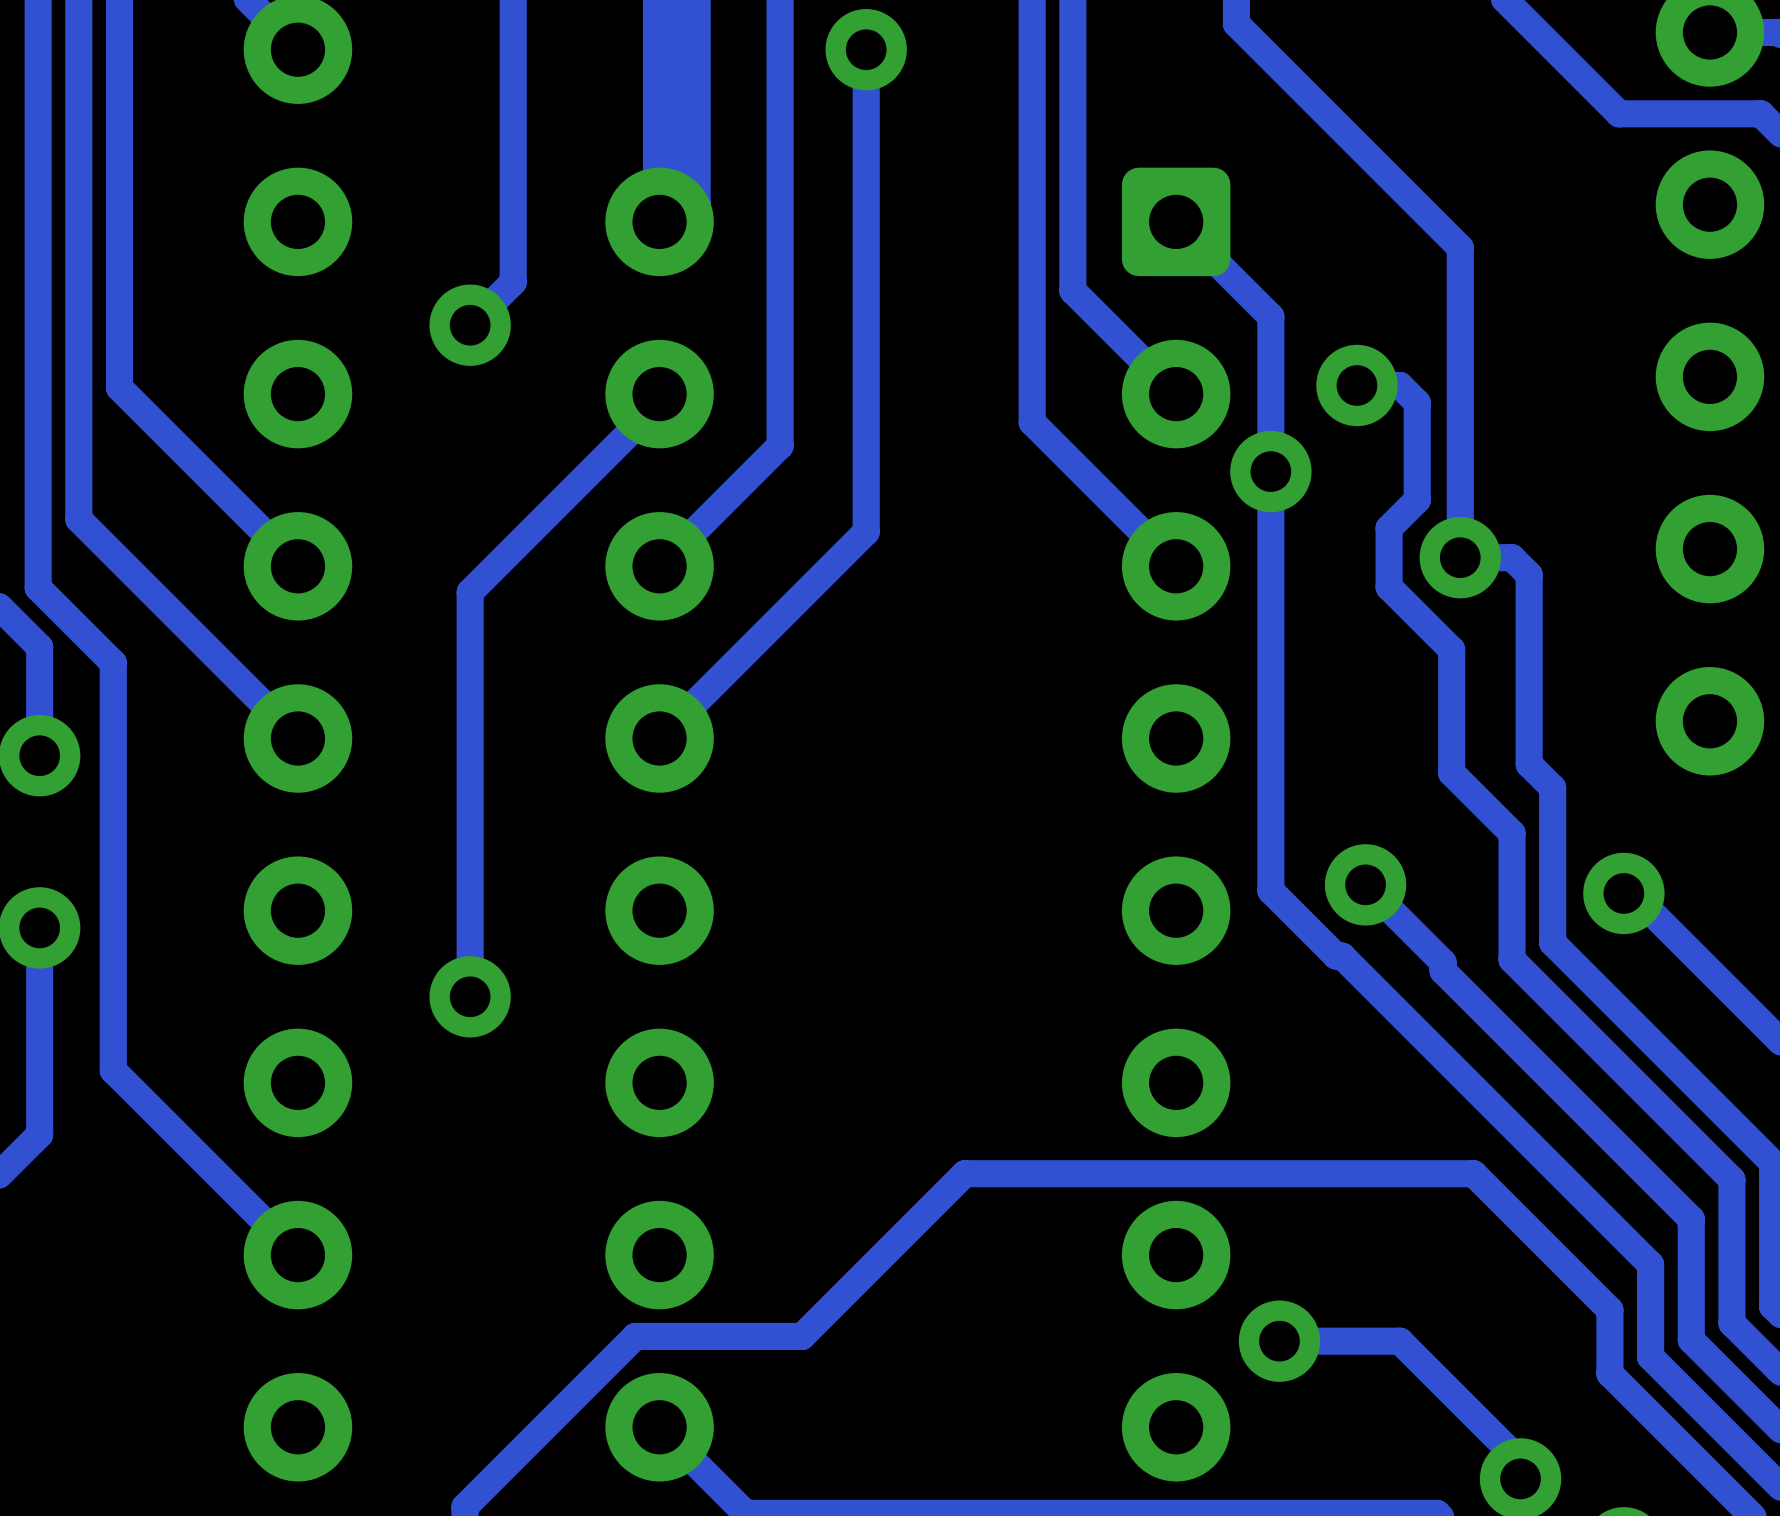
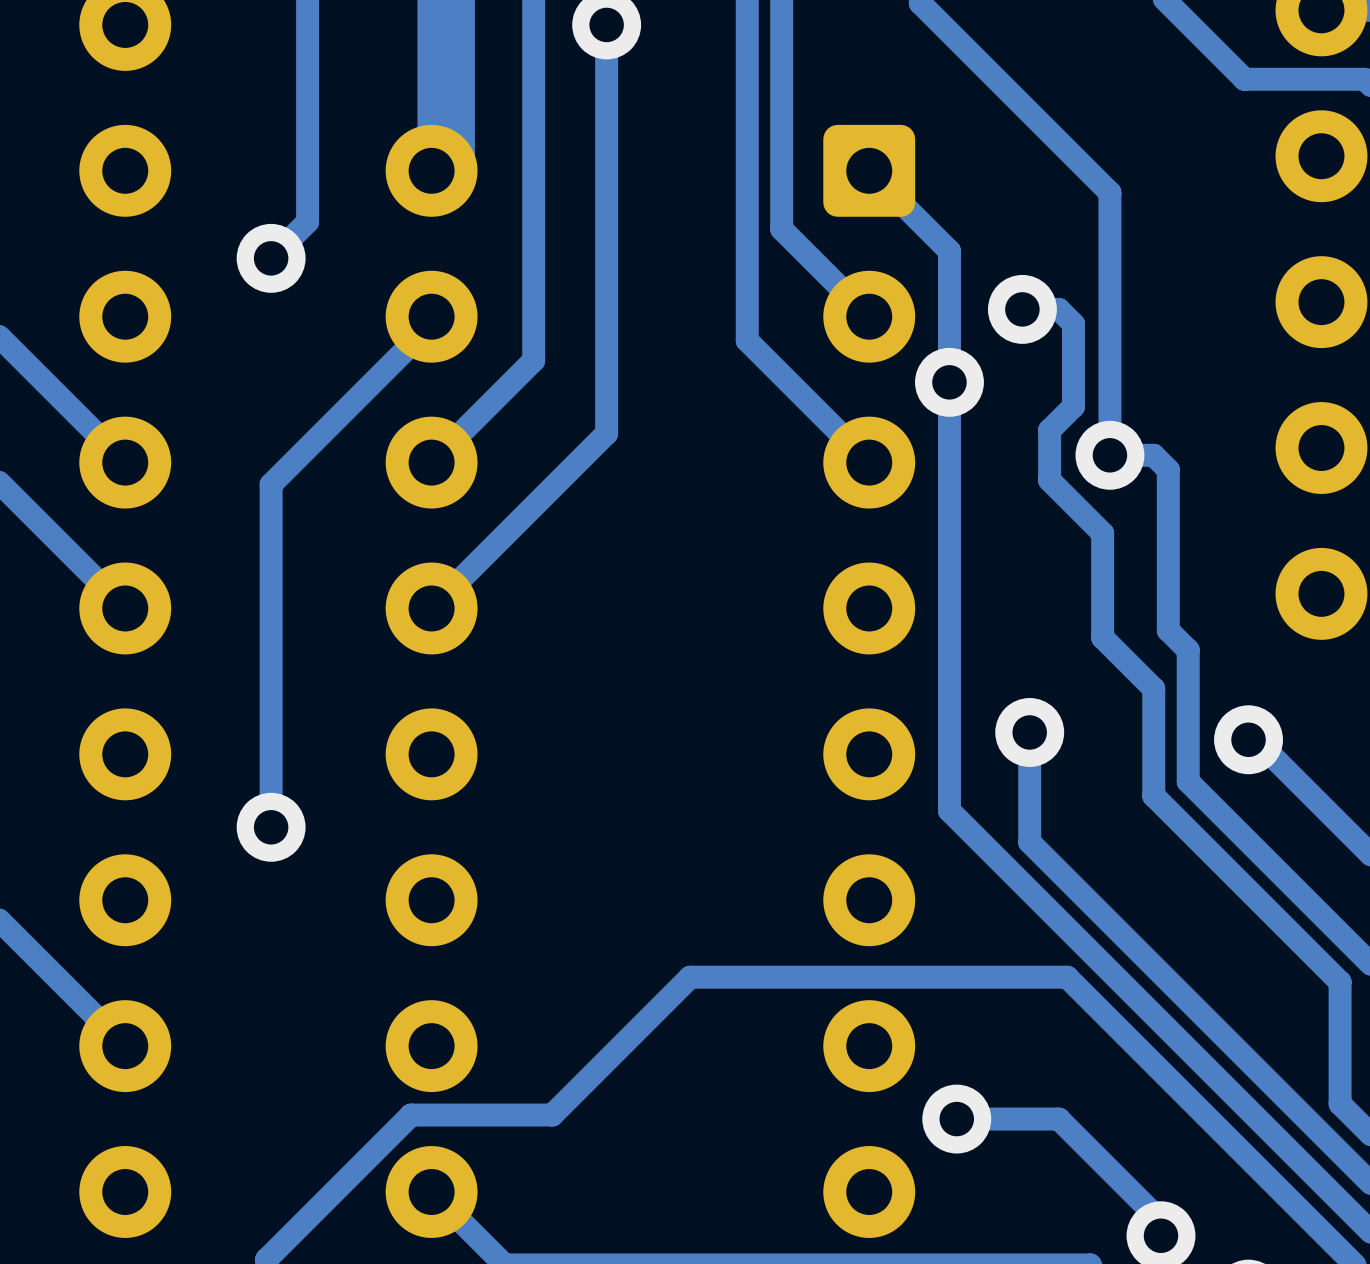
track: (1365, 884) (1443, 962) (1443, 970) (1691, 1219) (1691, 1340) -> (1029, 732) (1029, 842) (1305, 1118)
track: (1270, 890) (1336, 956) (1342, 956) (1650, 1264) (1650, 1356) -> (949, 737) (949, 810) (1271, 1132)
track: (1409, 1173) (1473, 1173) (1609, 1310) (1609, 1373) -> (1067, 977) (1236, 1146)

